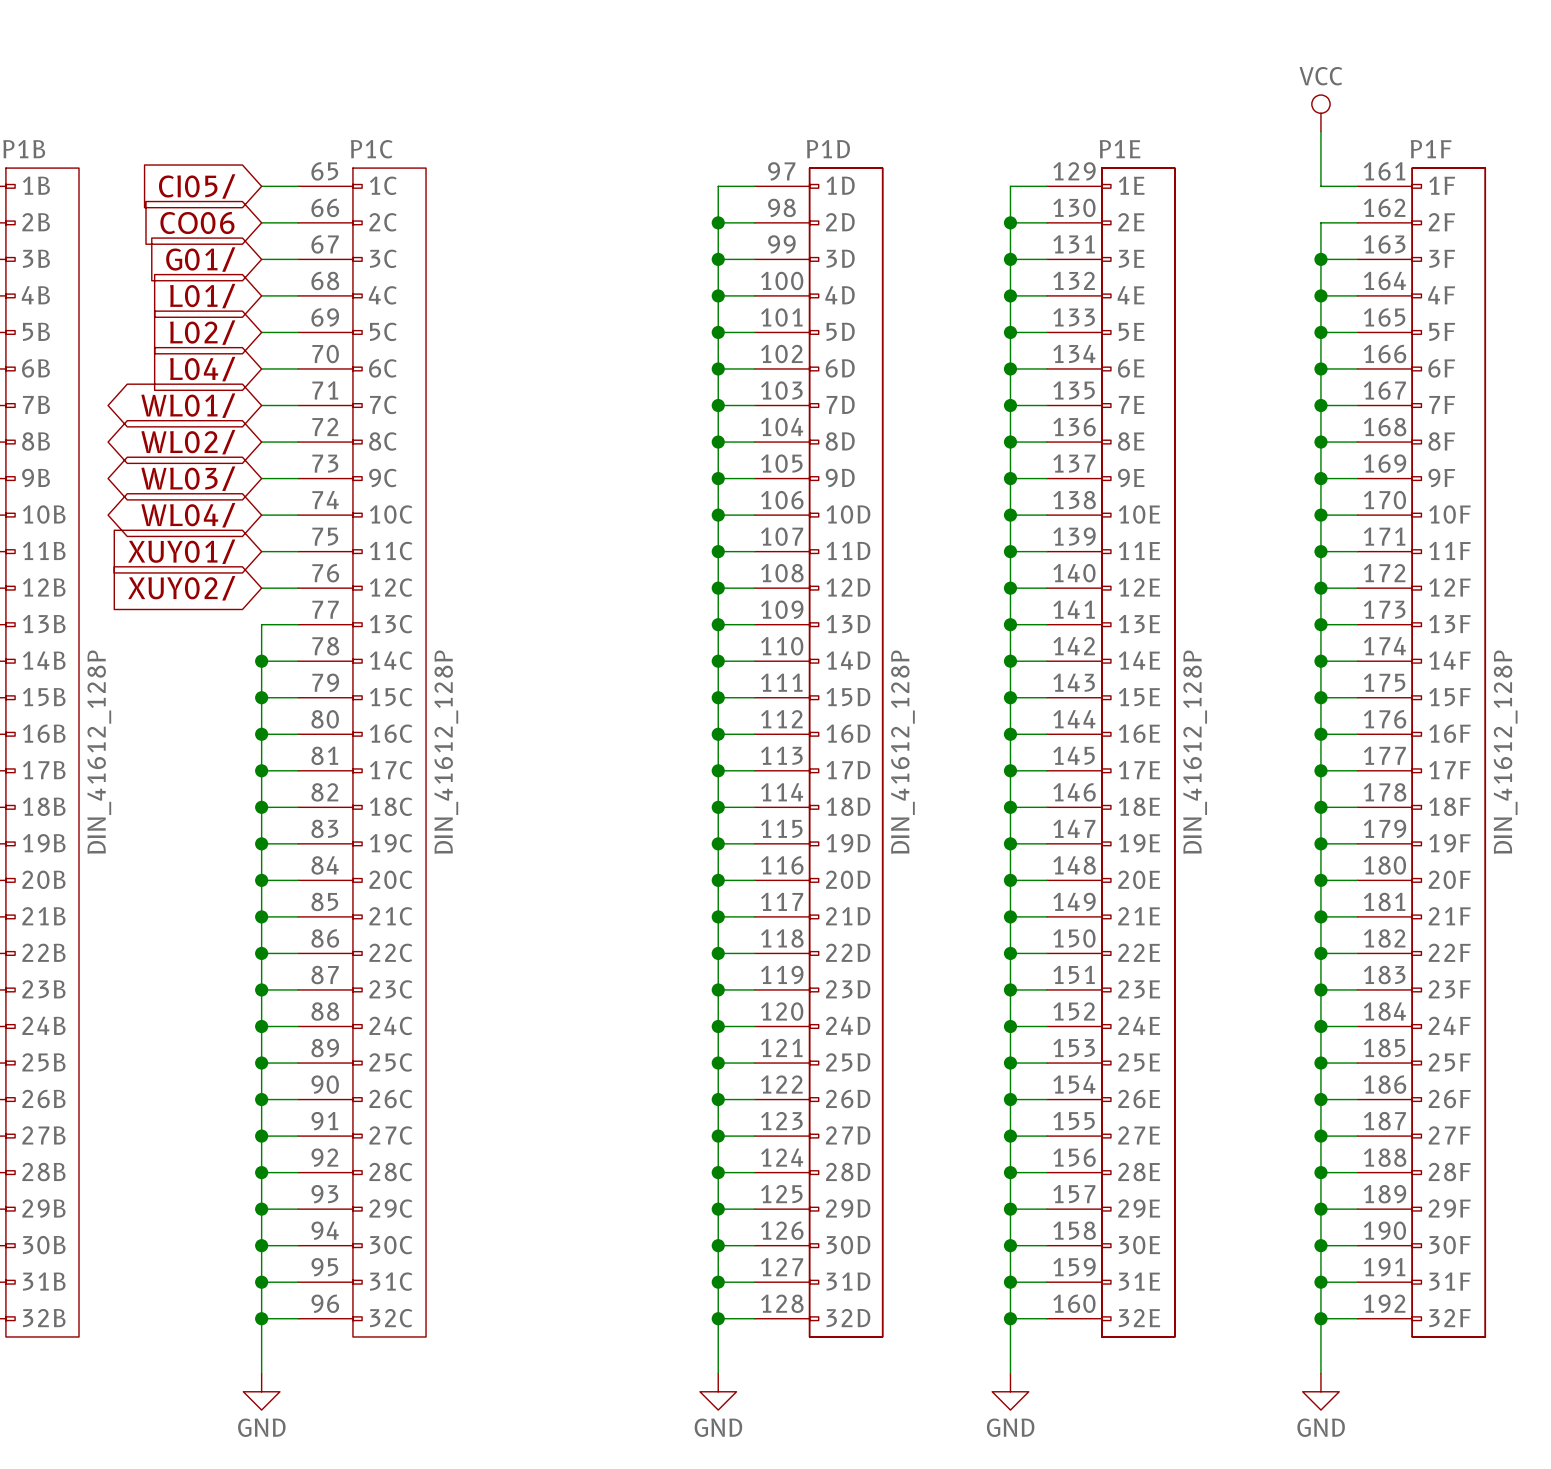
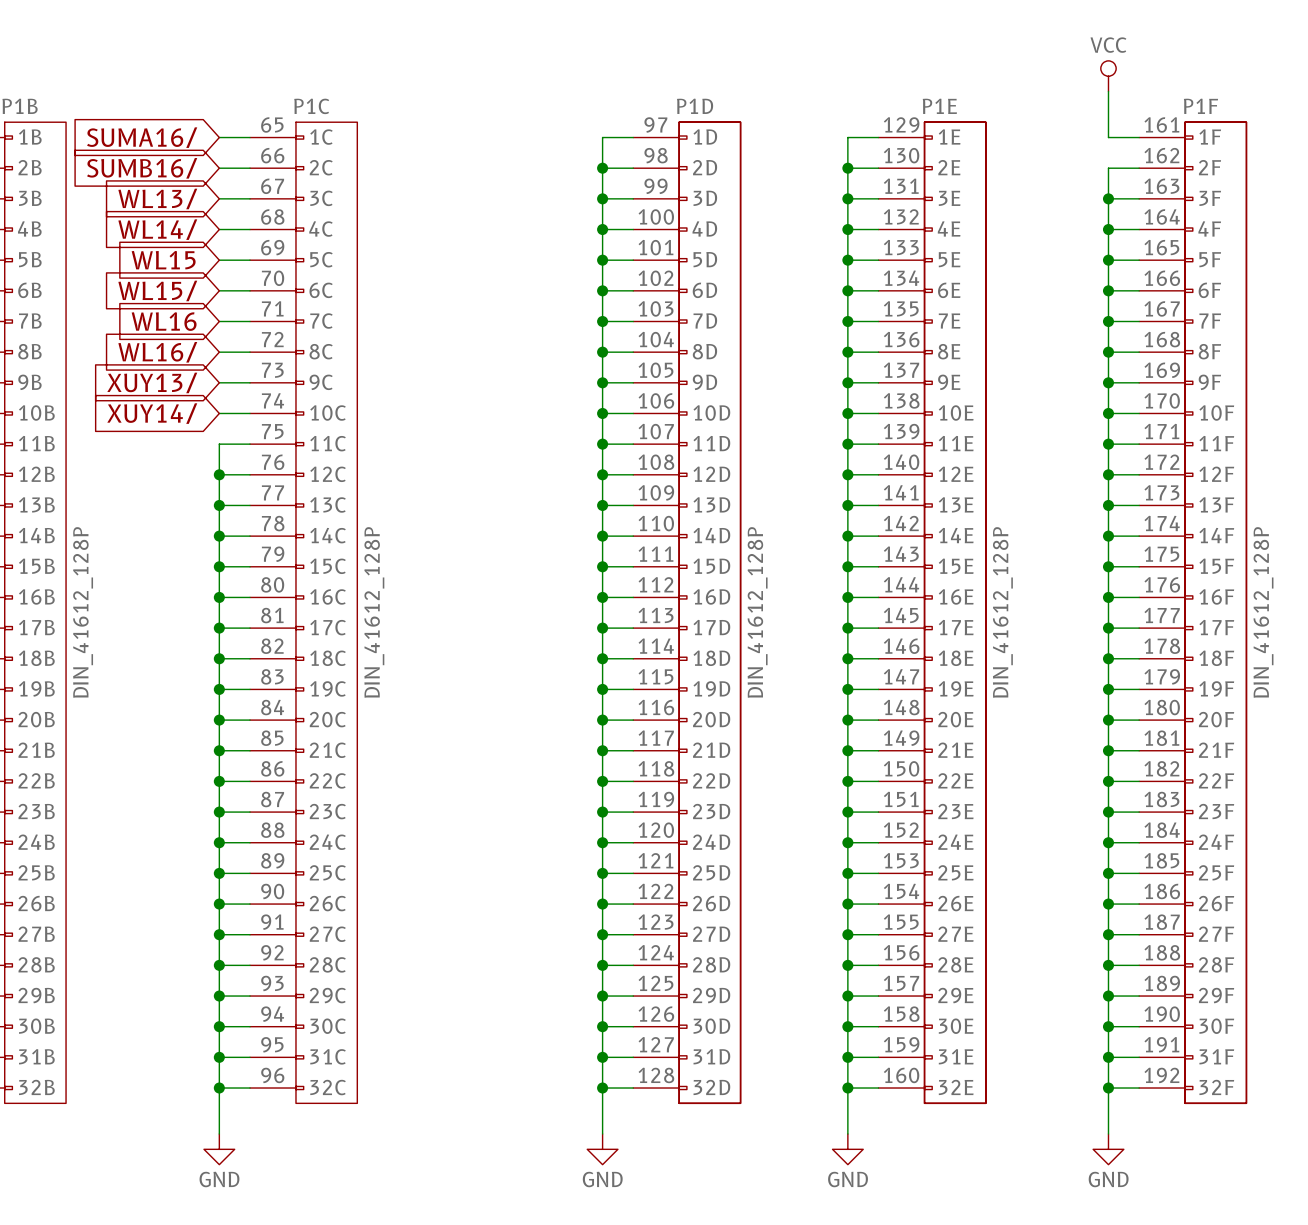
global label: CI05/ (197, 186) -> SUMA16/ (142, 137)
global label: CO06 (197, 223) -> SUMB16/ (142, 168)
global label: G01/ (200, 259) -> WL13/ (157, 198)
global label: L01/ (202, 296) -> WL14/ (157, 229)
global label: L02/ (202, 332) -> WL15 (163, 260)
global label: L04/ (202, 369) -> WL15/ (157, 290)
global label shape: bidirectional (188, 405) -> input (164, 321)
global label: WL01/ (188, 405) -> WL16 (164, 321)
global label shape: bidirectional (188, 442) -> input (157, 352)
global label: WL02/ (188, 442) -> WL16/ (157, 352)
global label shape: bidirectional (188, 478) -> input (152, 382)
global label: WL03/ (188, 478) -> XUY13/ (152, 382)
global label shape: bidirectional (188, 515) -> input (152, 413)
global label: WL04/ (188, 515) -> XUY14/ (152, 413)
global label: XUY01/ (181, 551) -> none
wire: none -> (219, 444) (219, 505)
global label: XUY02/ (181, 588) -> none
junction: none -> (219, 474)
junction: none -> (219, 505)

